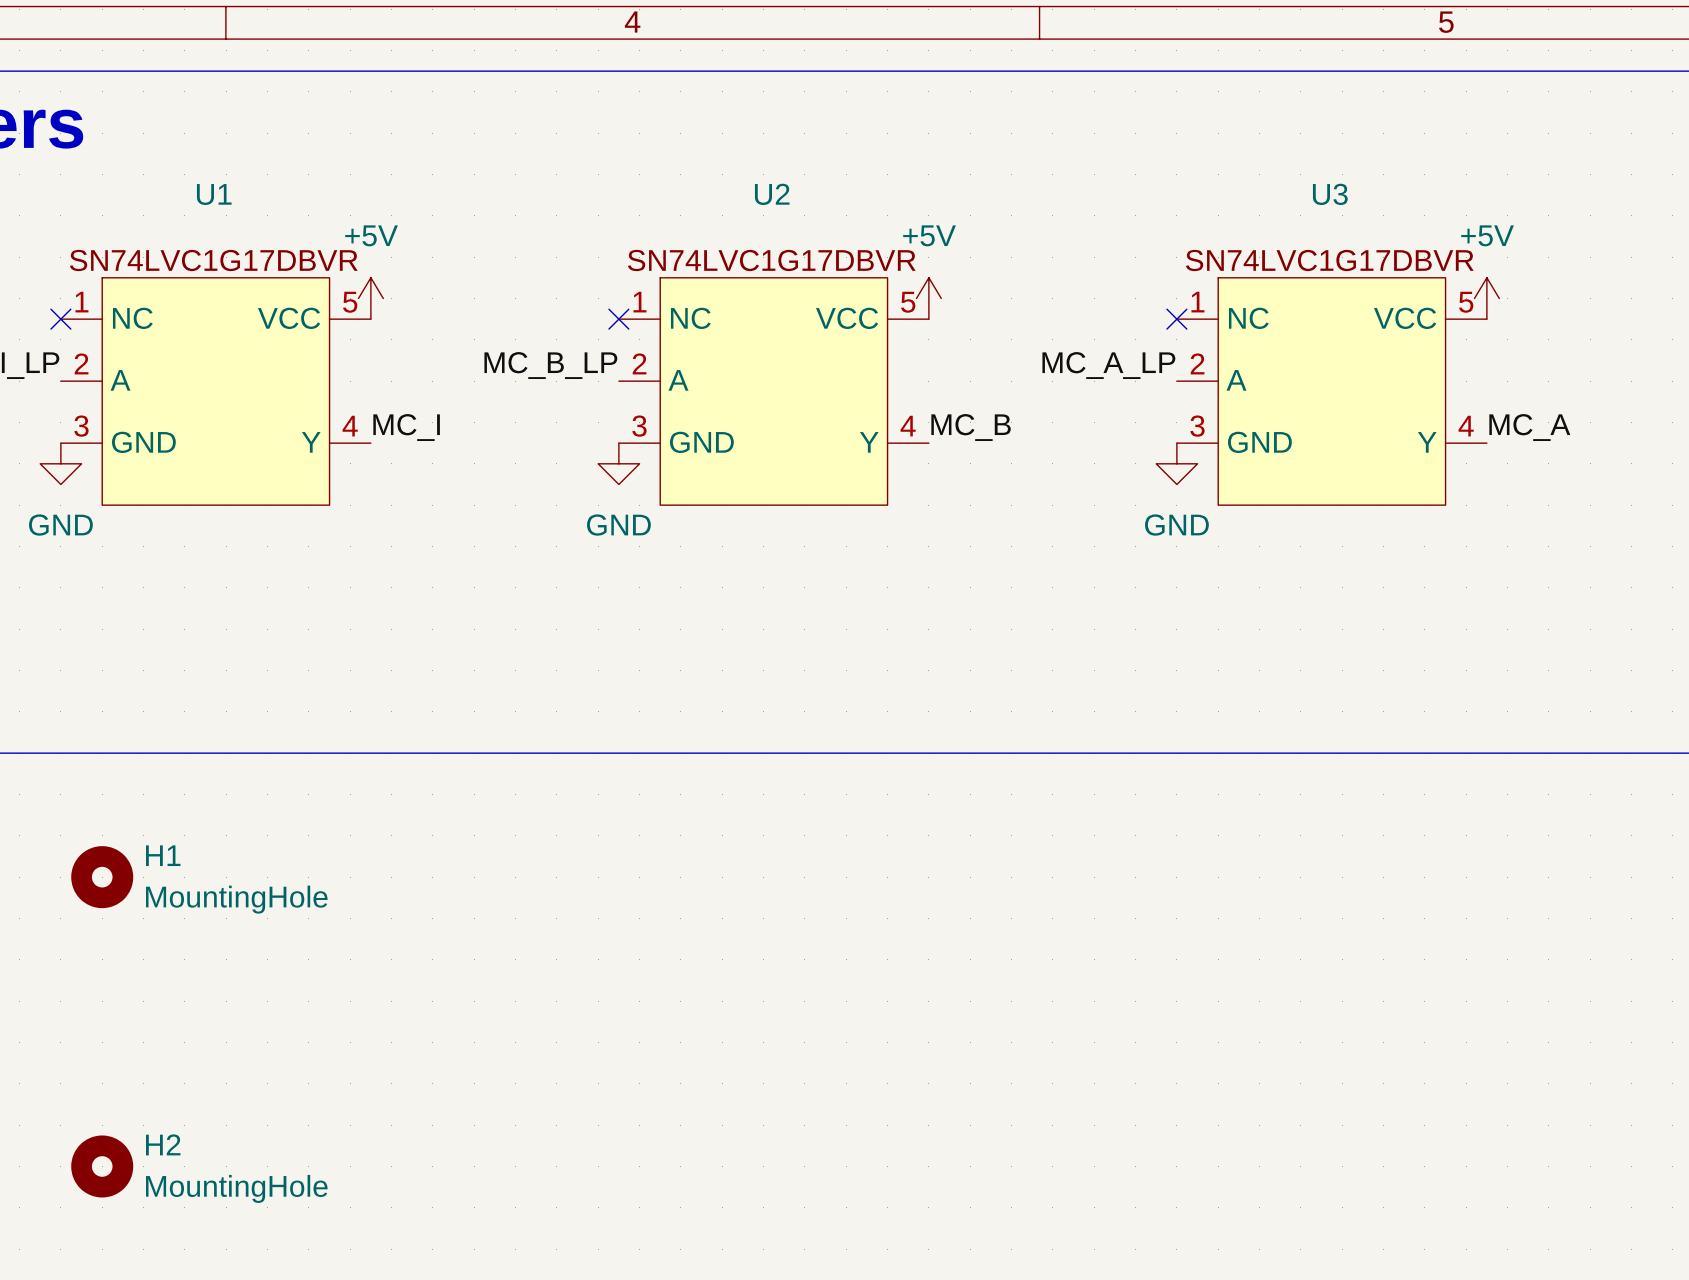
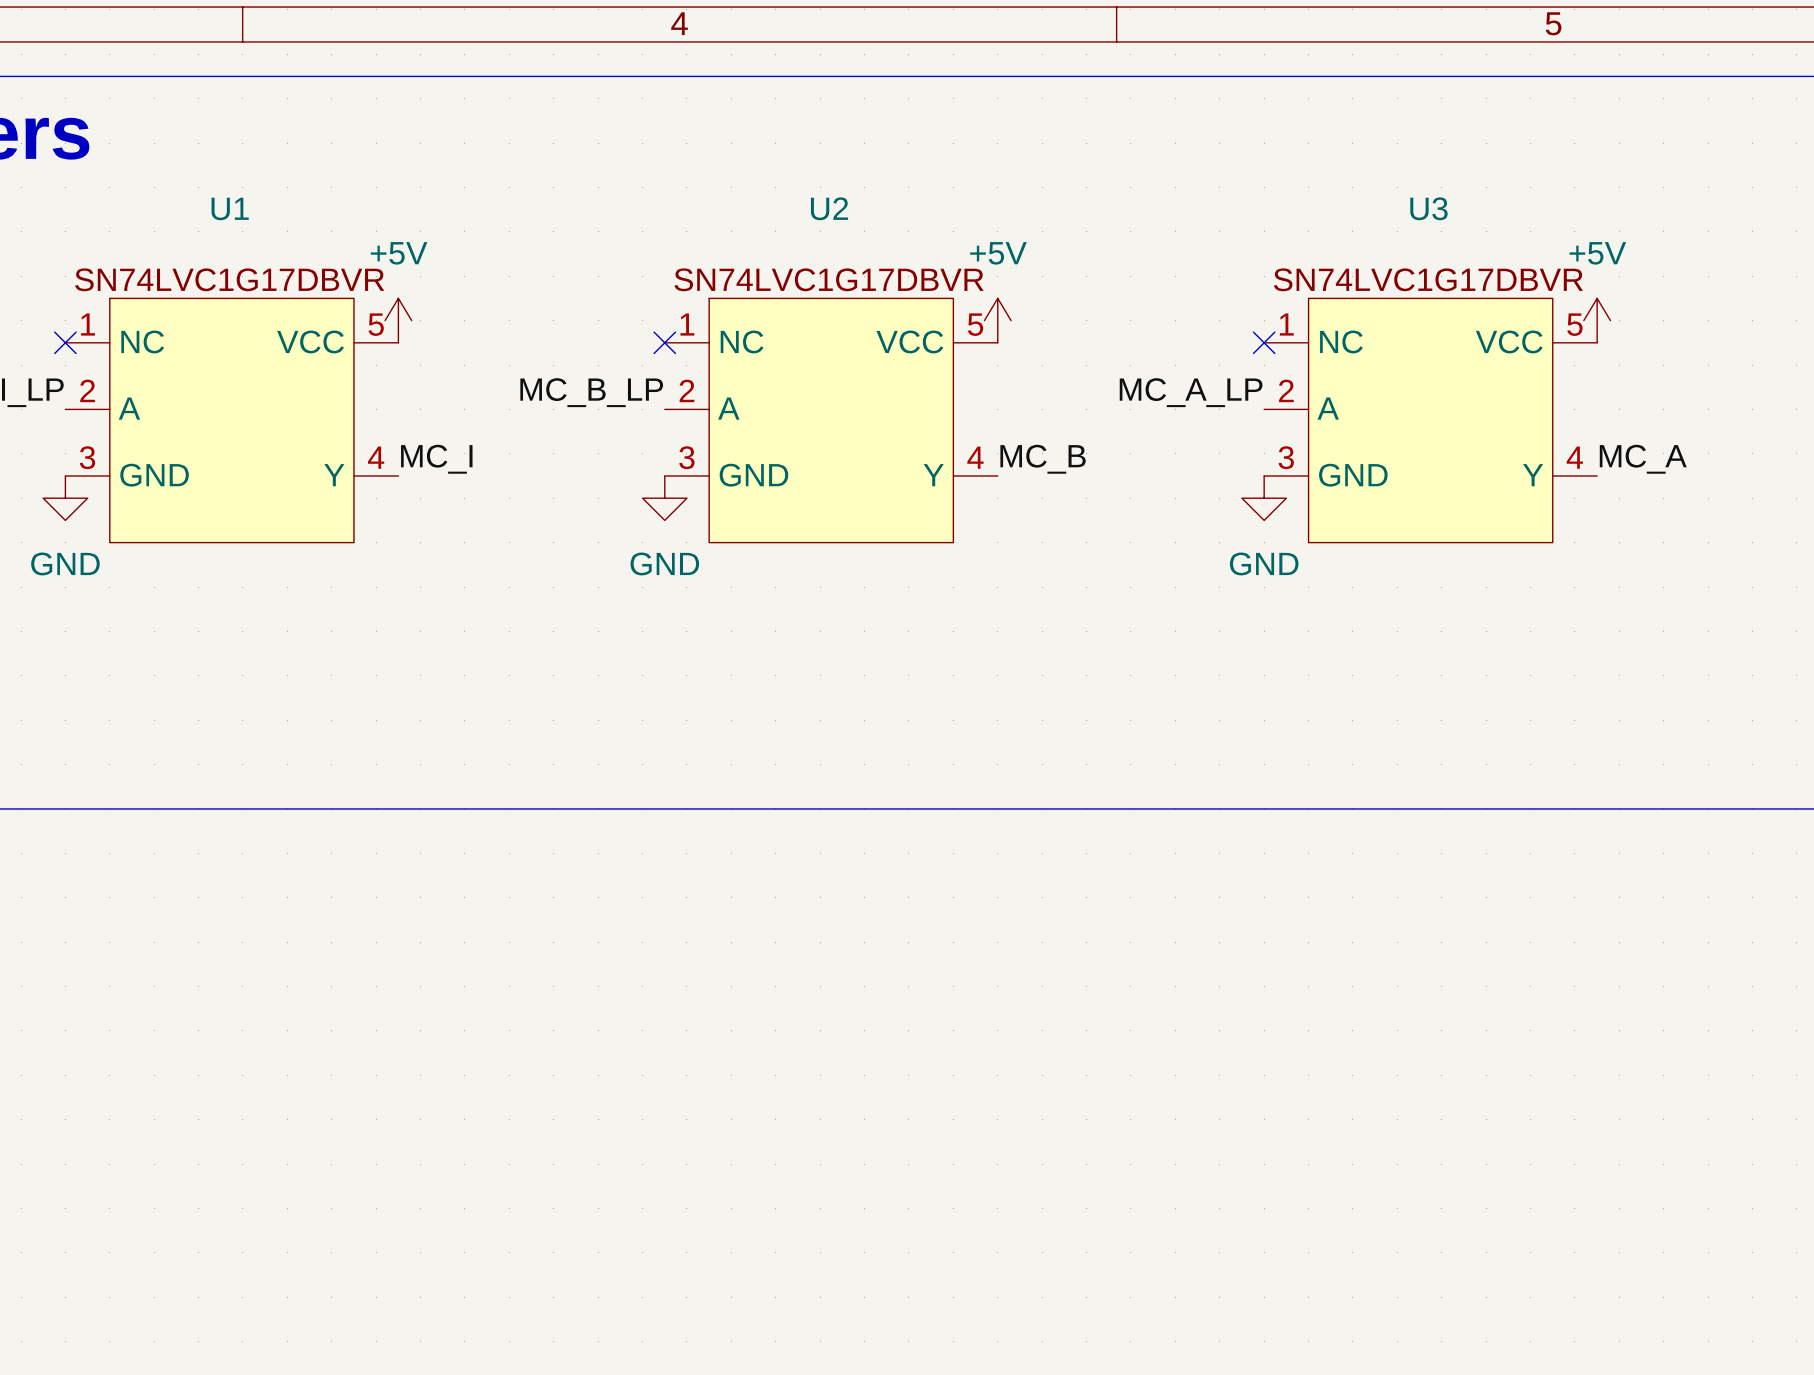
H1: MountingHole (102, 877) -> none
H2: MountingHole (102, 1166) -> none

